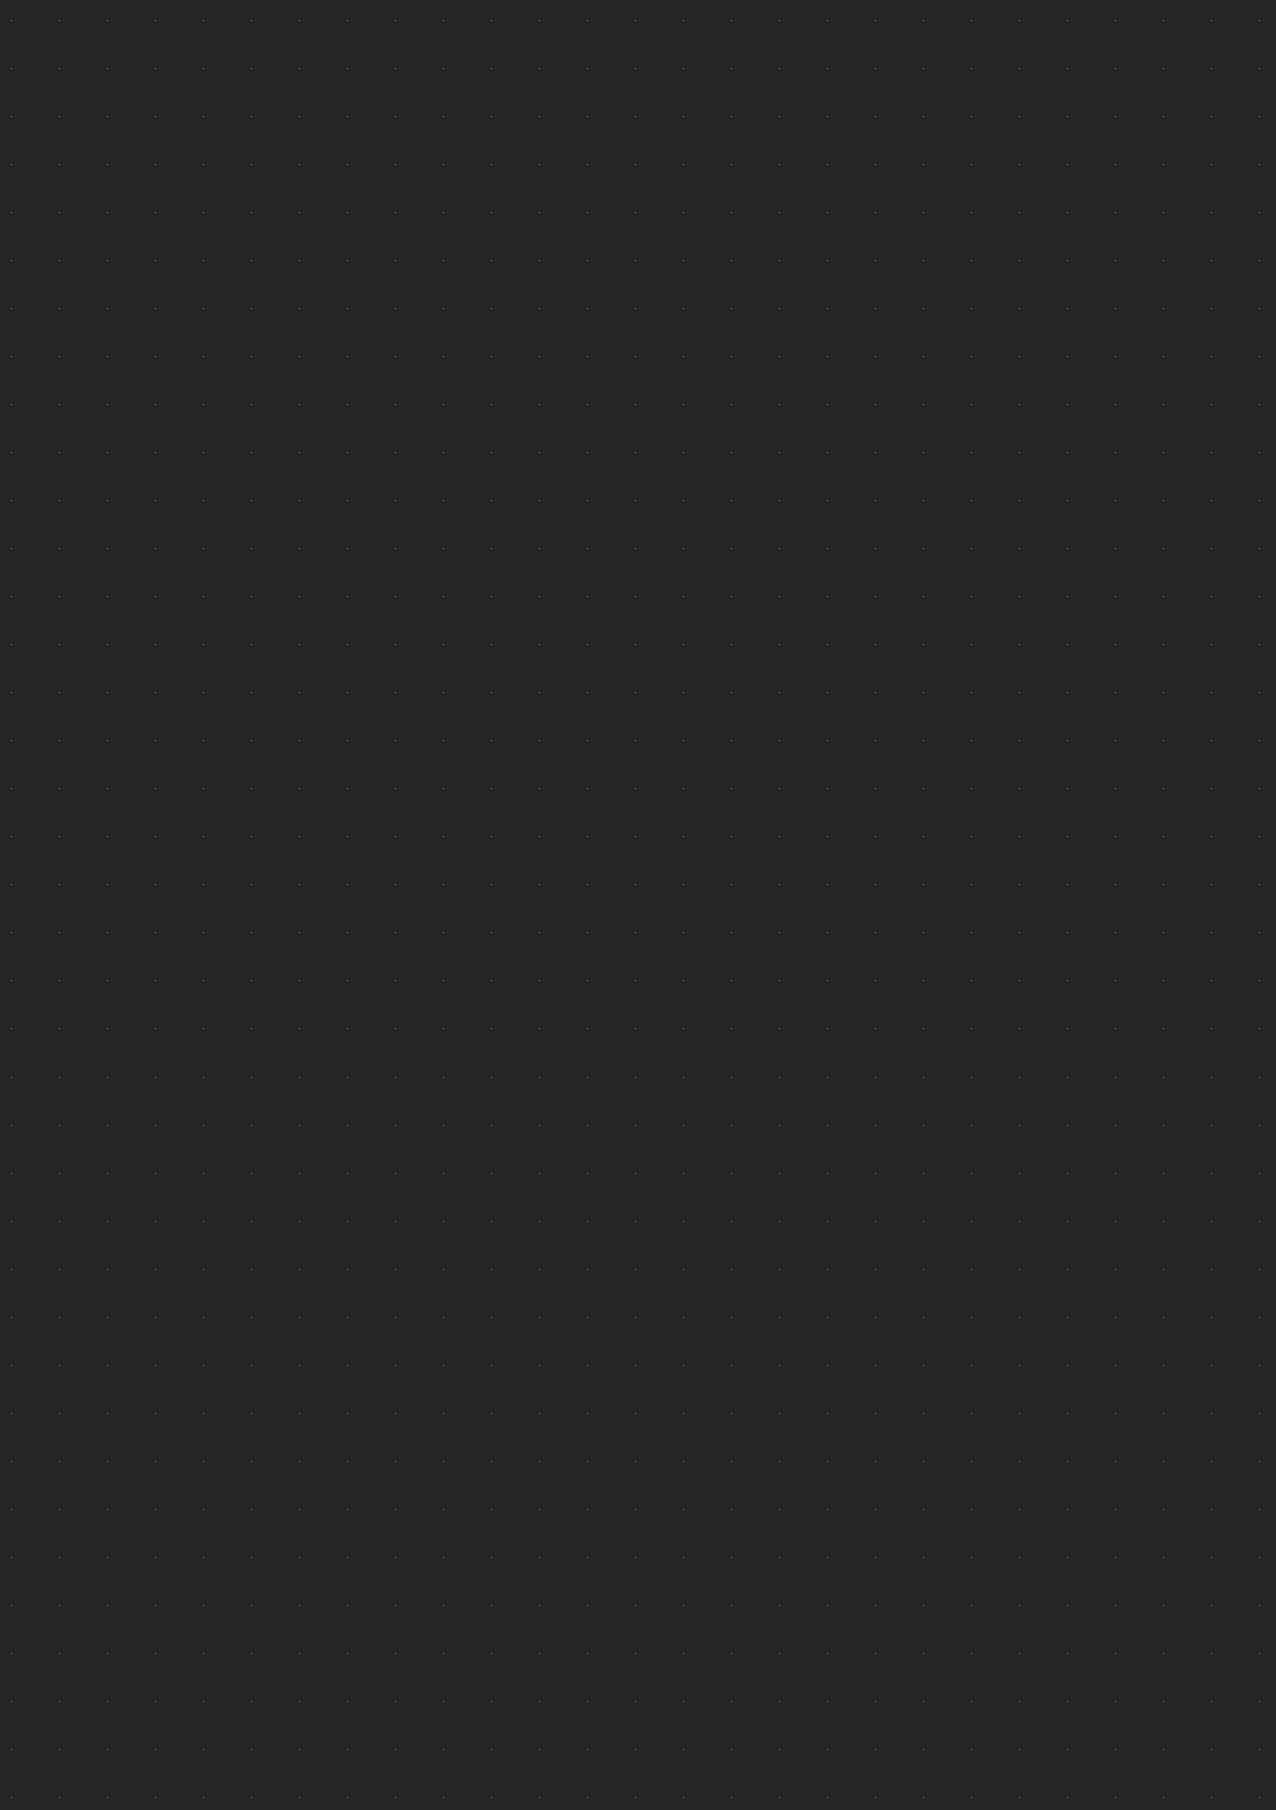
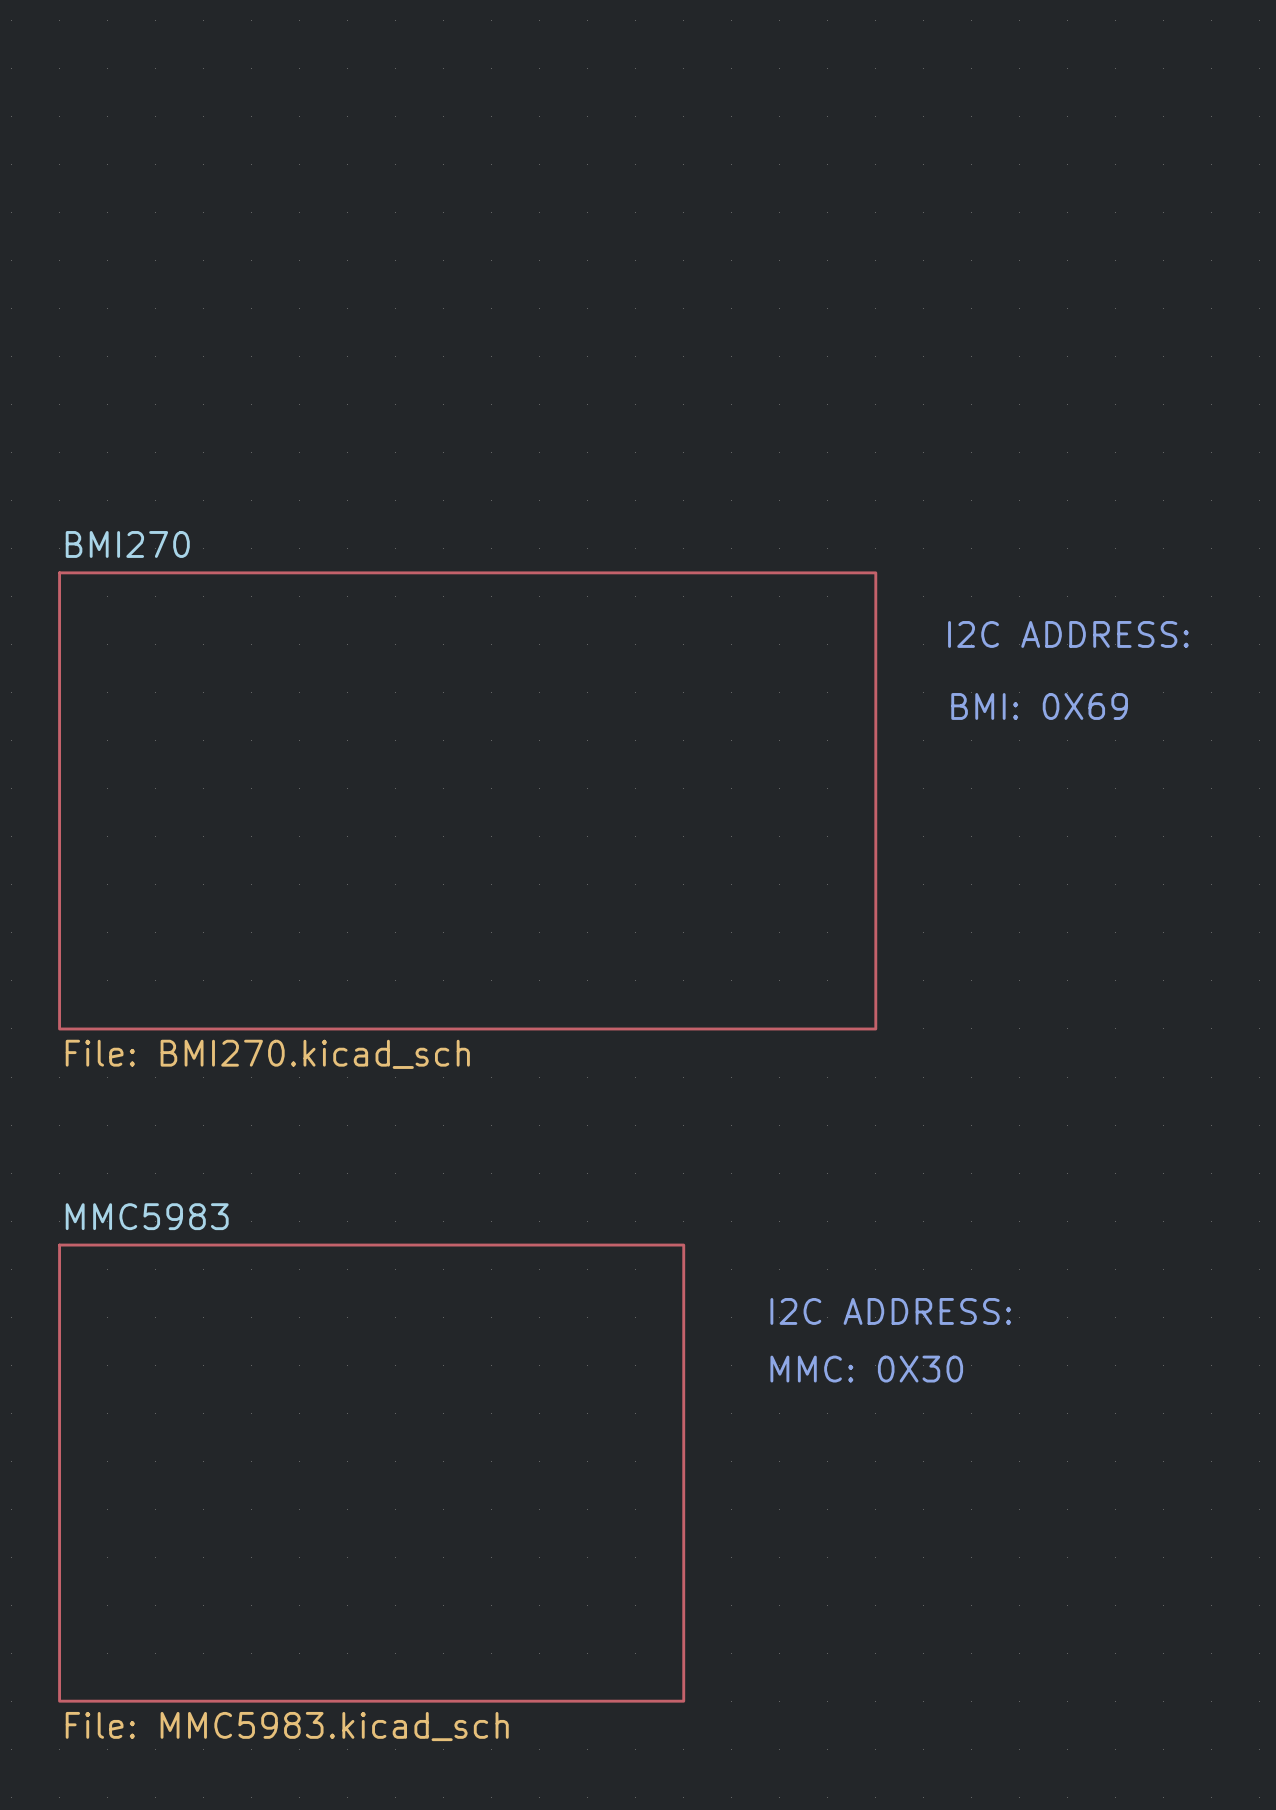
text: none -> I2C ADDRESS: (1068, 634)
text: none -> BMI: 0X69 (1039, 706)
sheet BMI270: none -> File: BMI270.kicad_sch (467, 800)
text: none -> I2C ADDRESS: (890, 1311)
text: none -> MMC: 0X30 (866, 1369)
sheet MMC5983: none -> File: MMC5983.kicad_sch (371, 1473)

